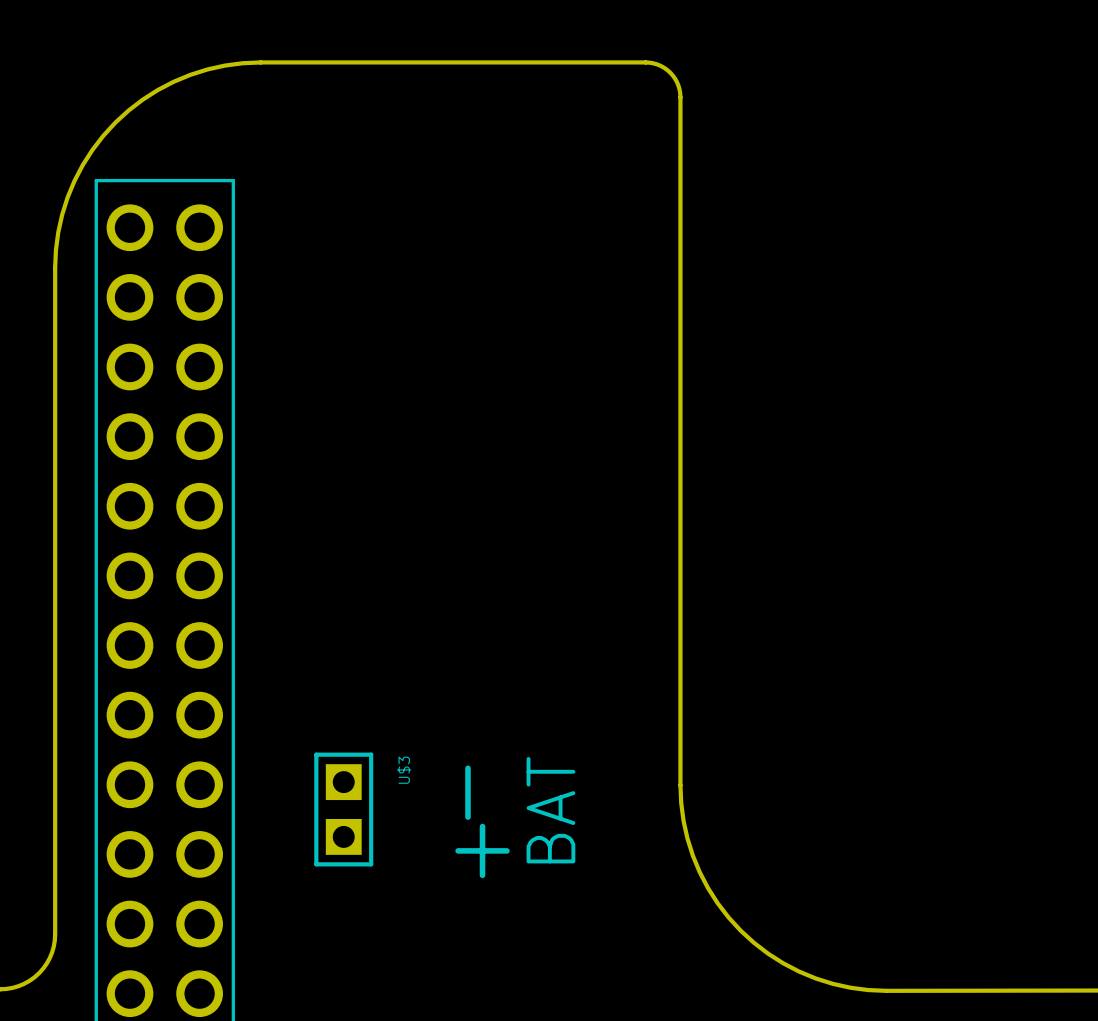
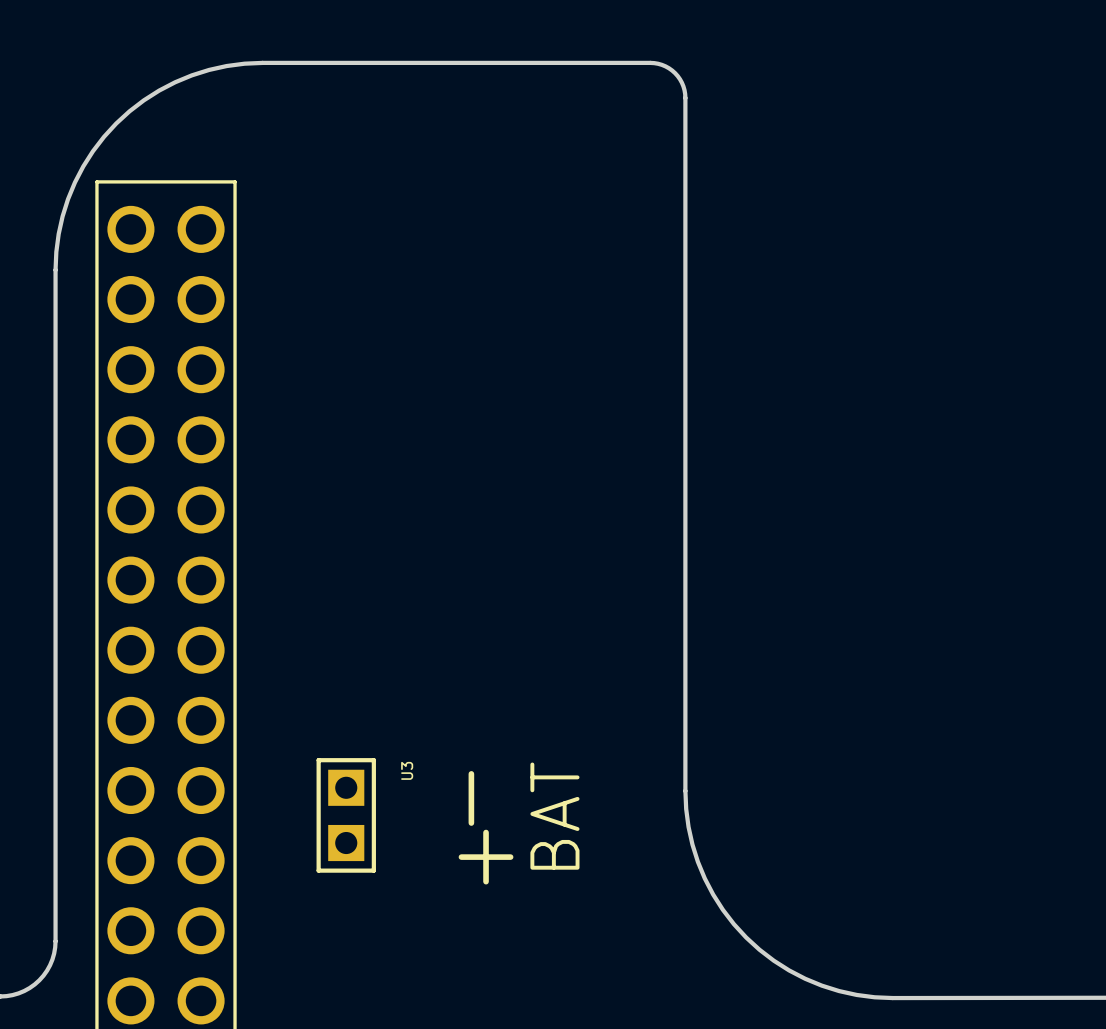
U$3 name: U$3 (404, 770) -> U3 (407, 770)

